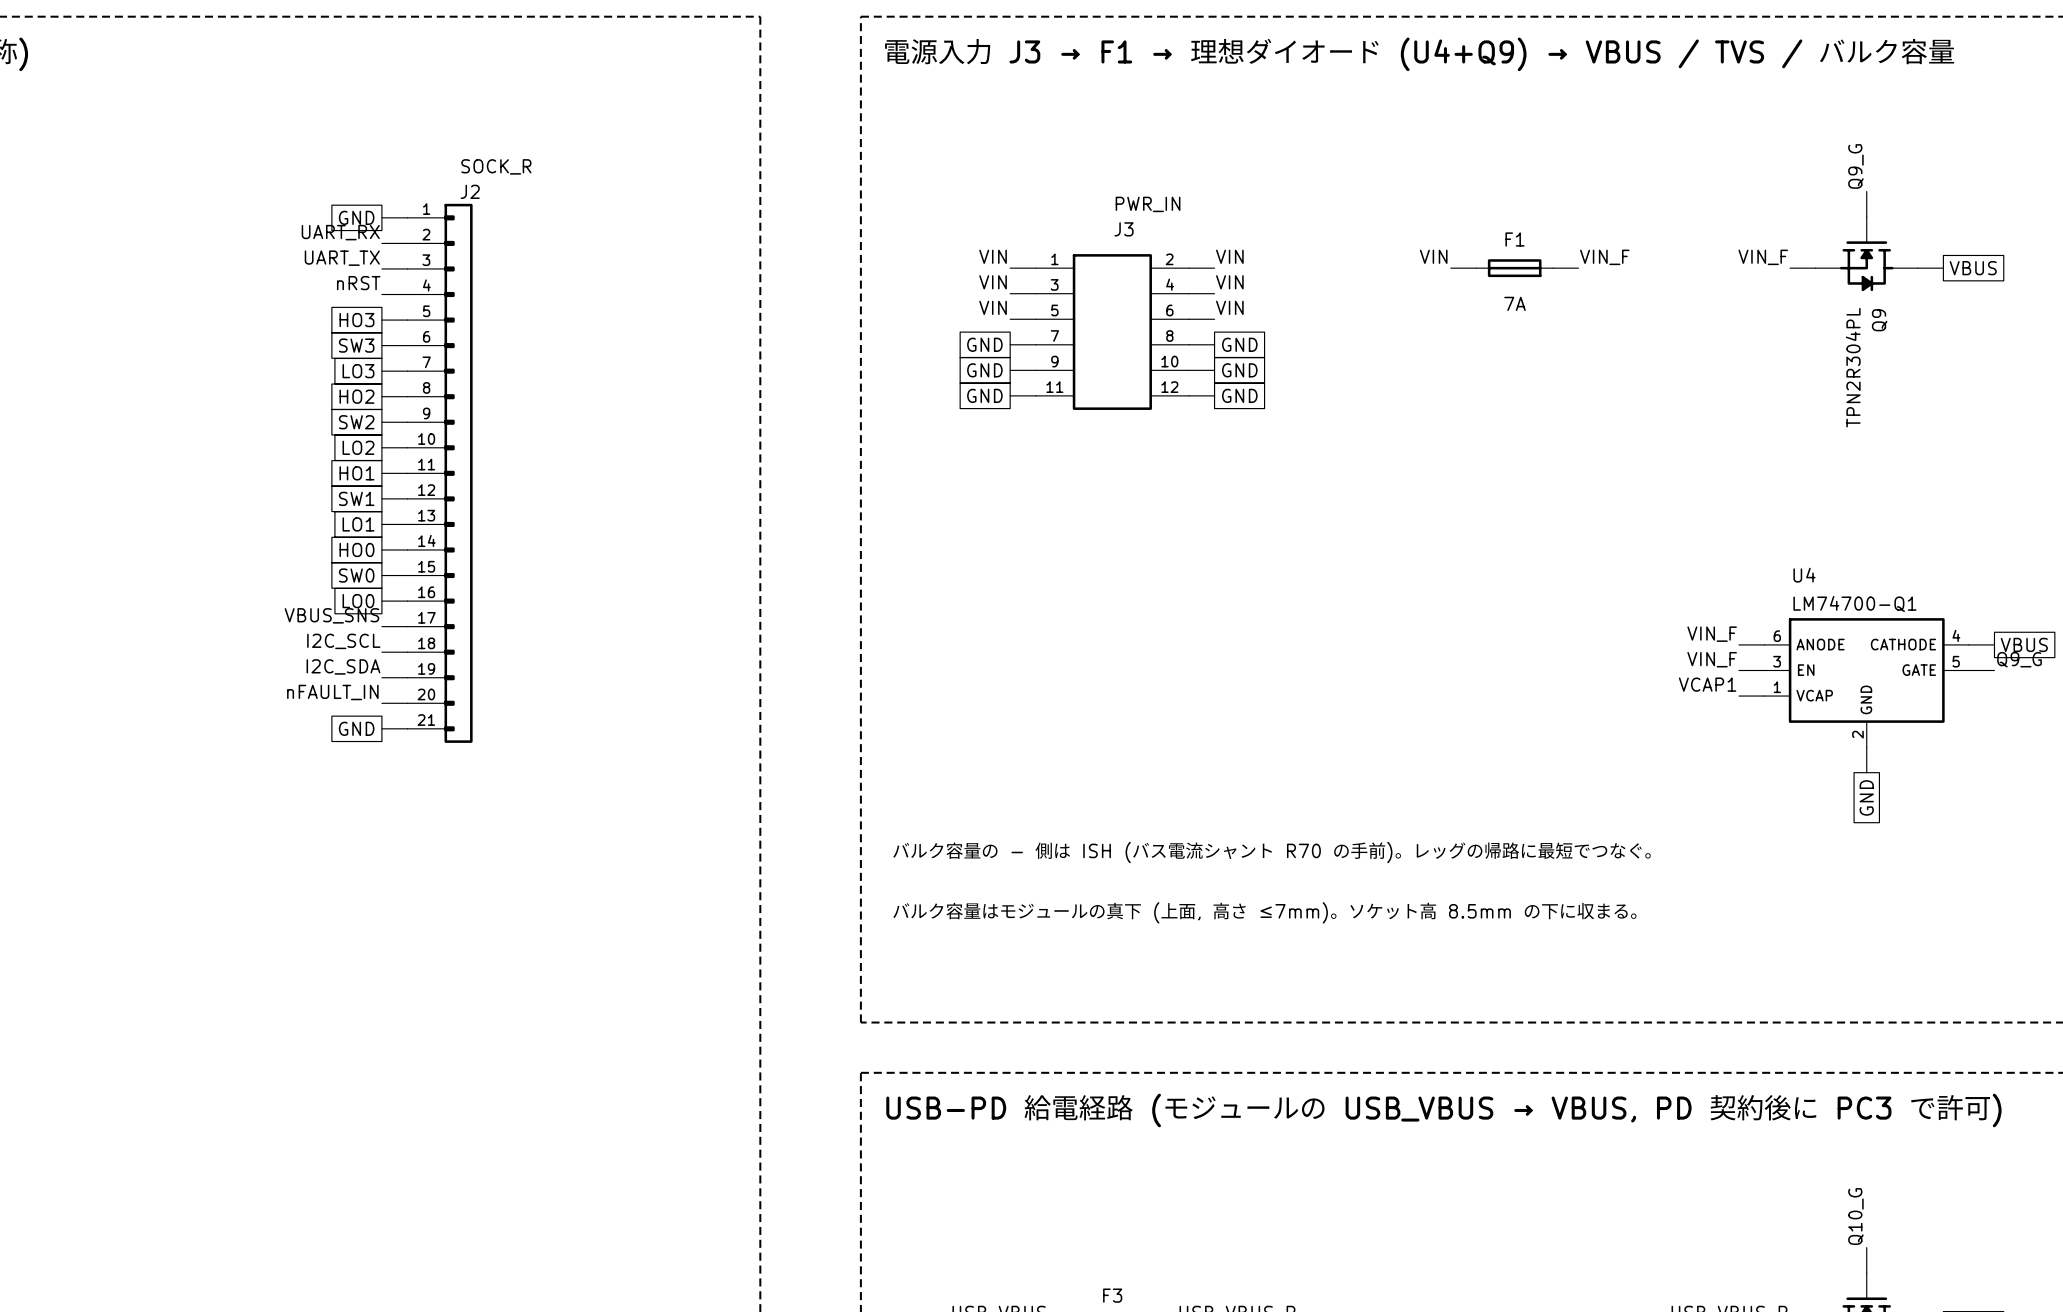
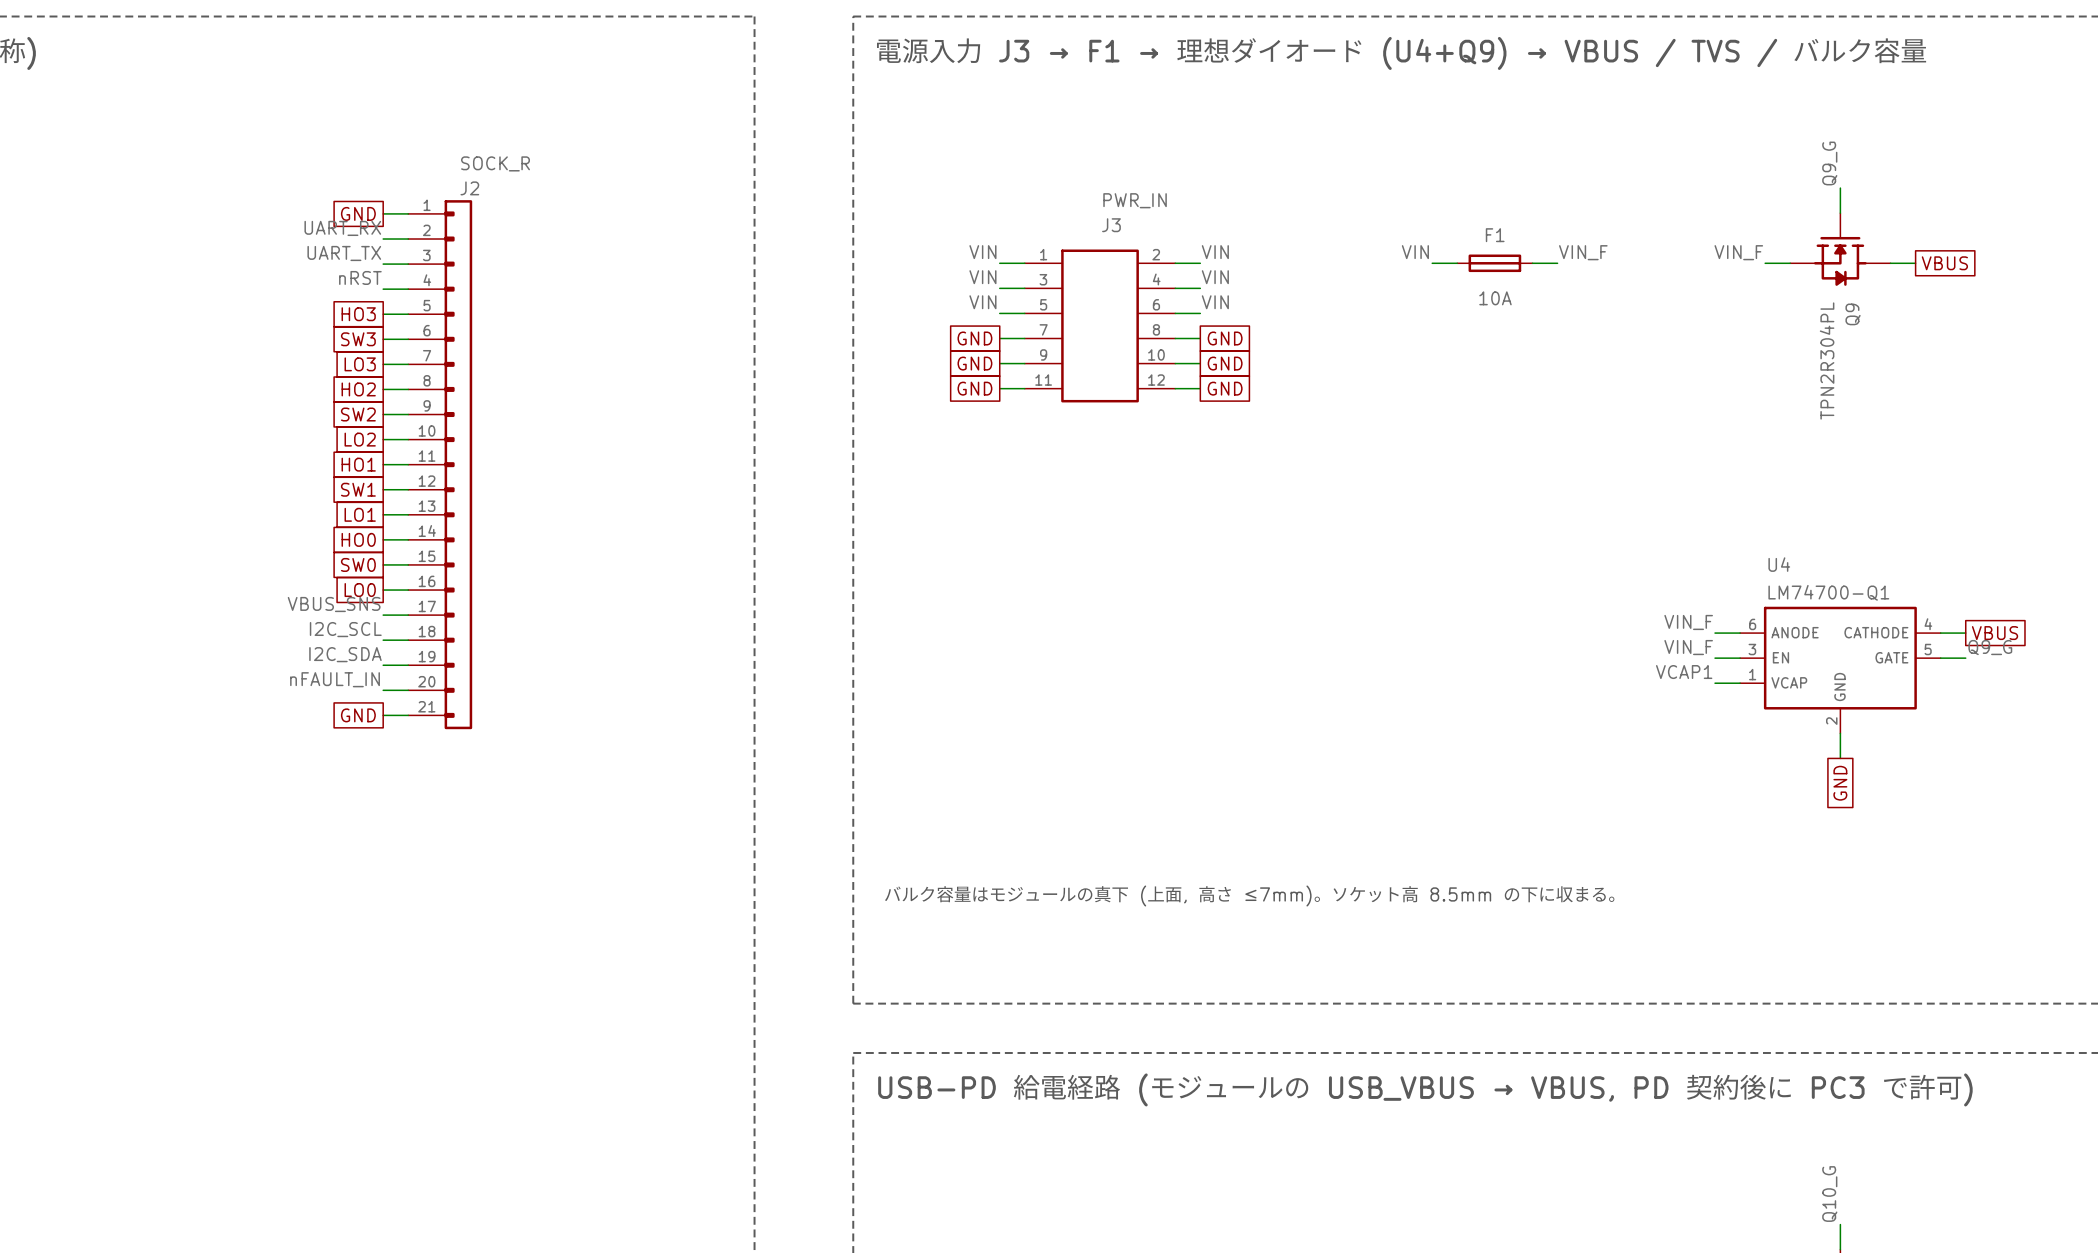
F1 value: 7A (1515, 303) -> 10A (1495, 298)
text: バルク容量の − 側は ISH (バス電流シャント R70 の手前)。レッグの帰路に最短でつなぐ。 (1271, 852) -> none

